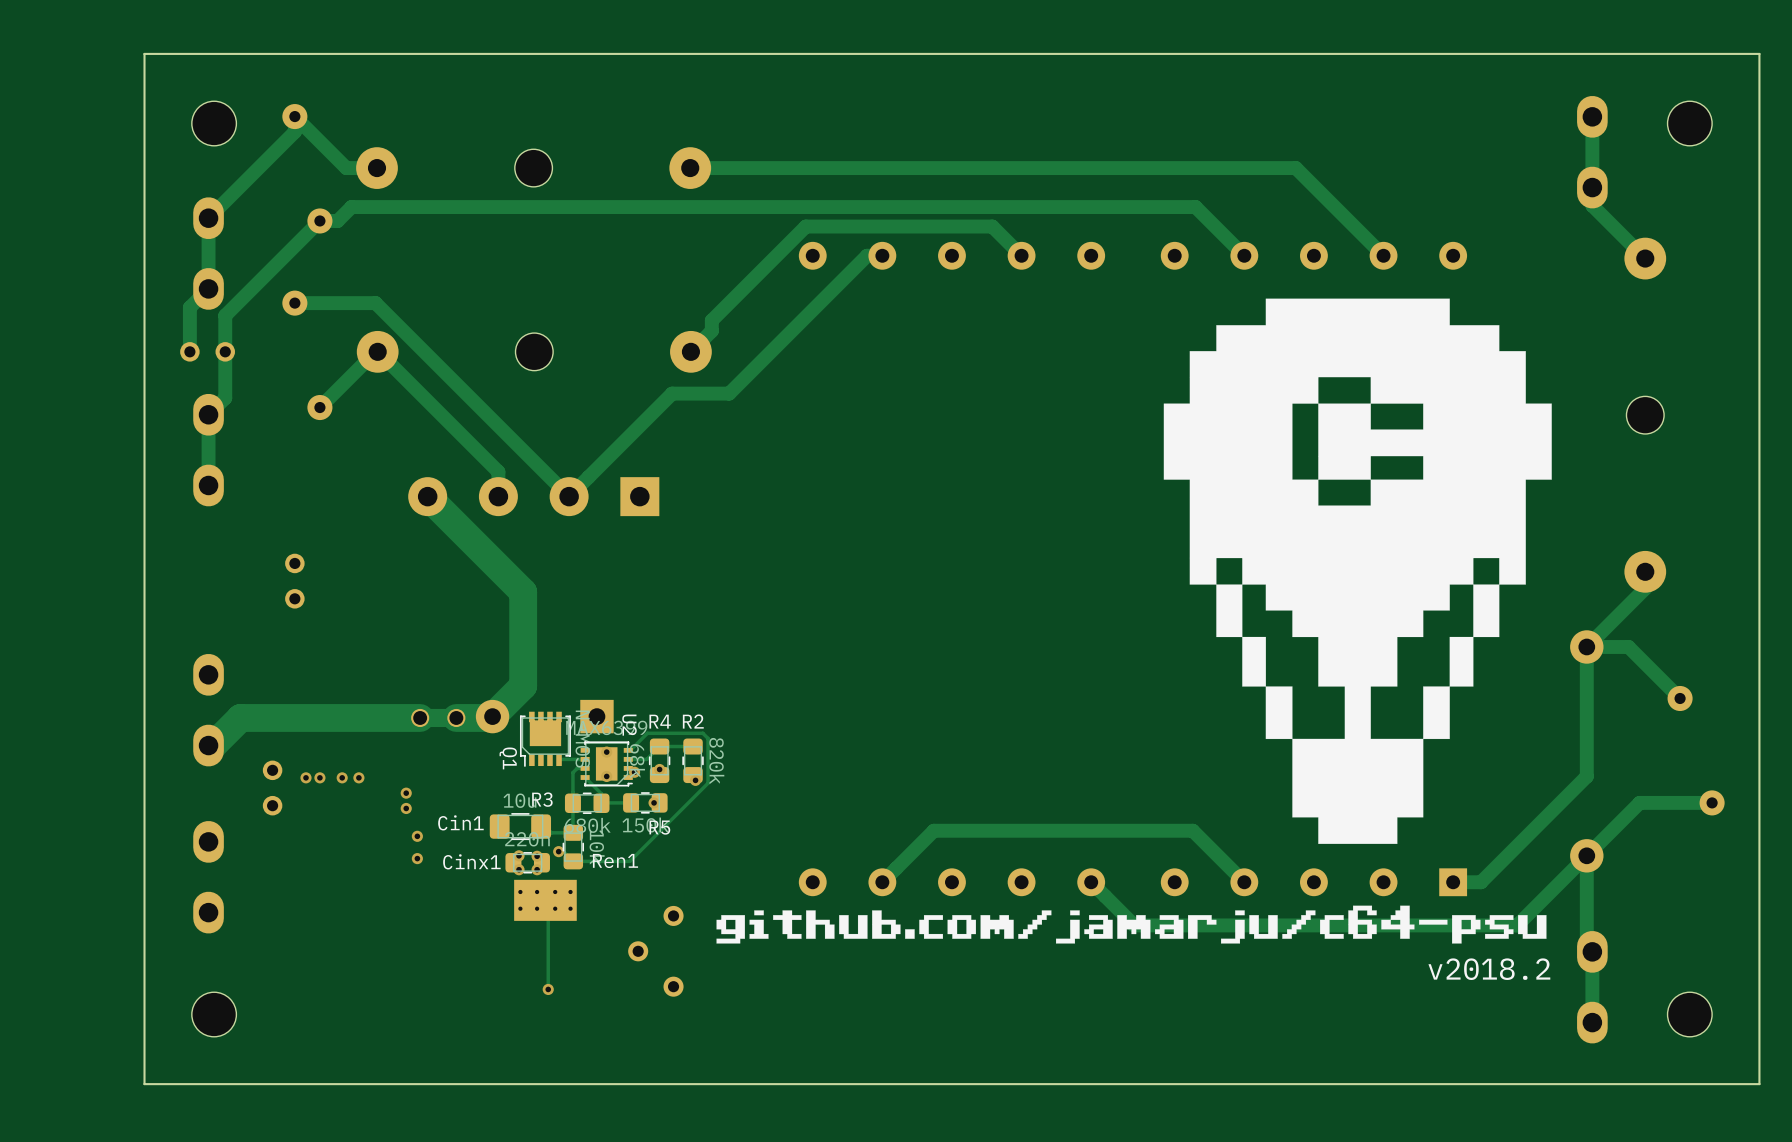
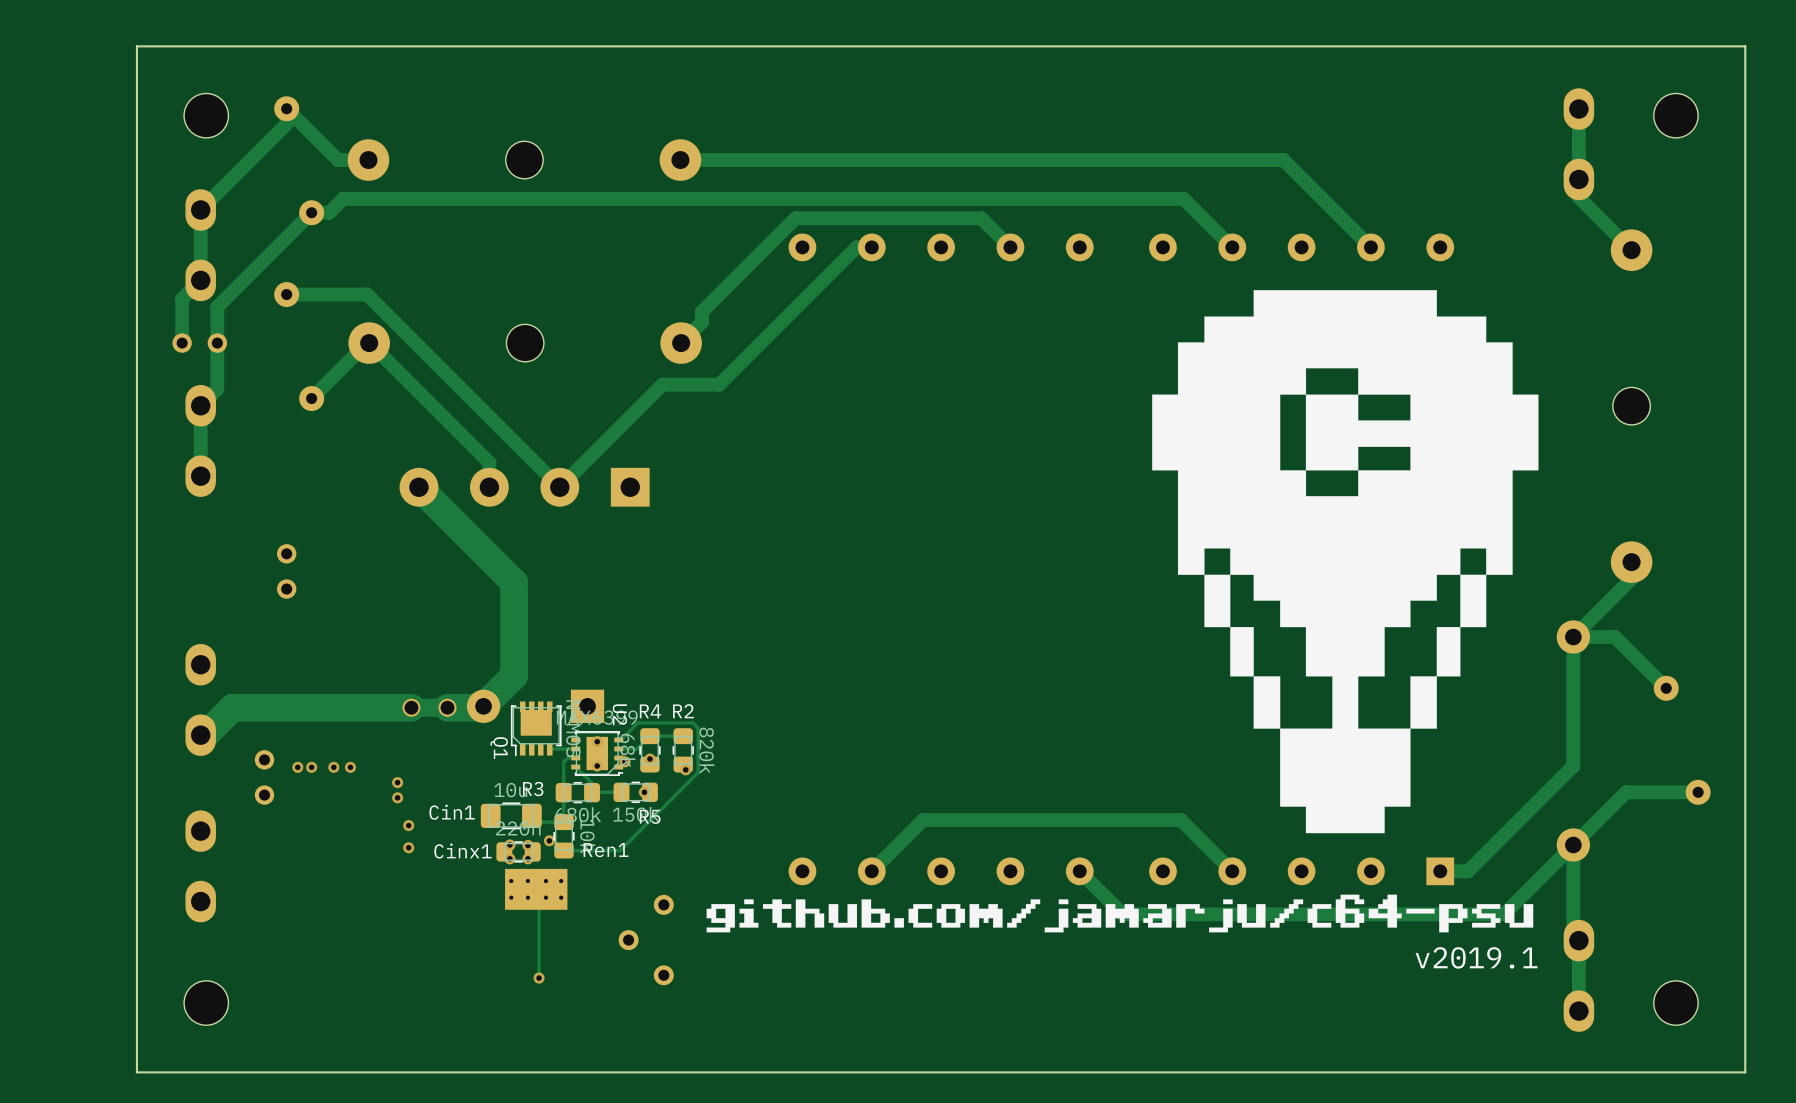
text: v2018.2 (1489, 969) -> v2019.1 (1476, 957)

